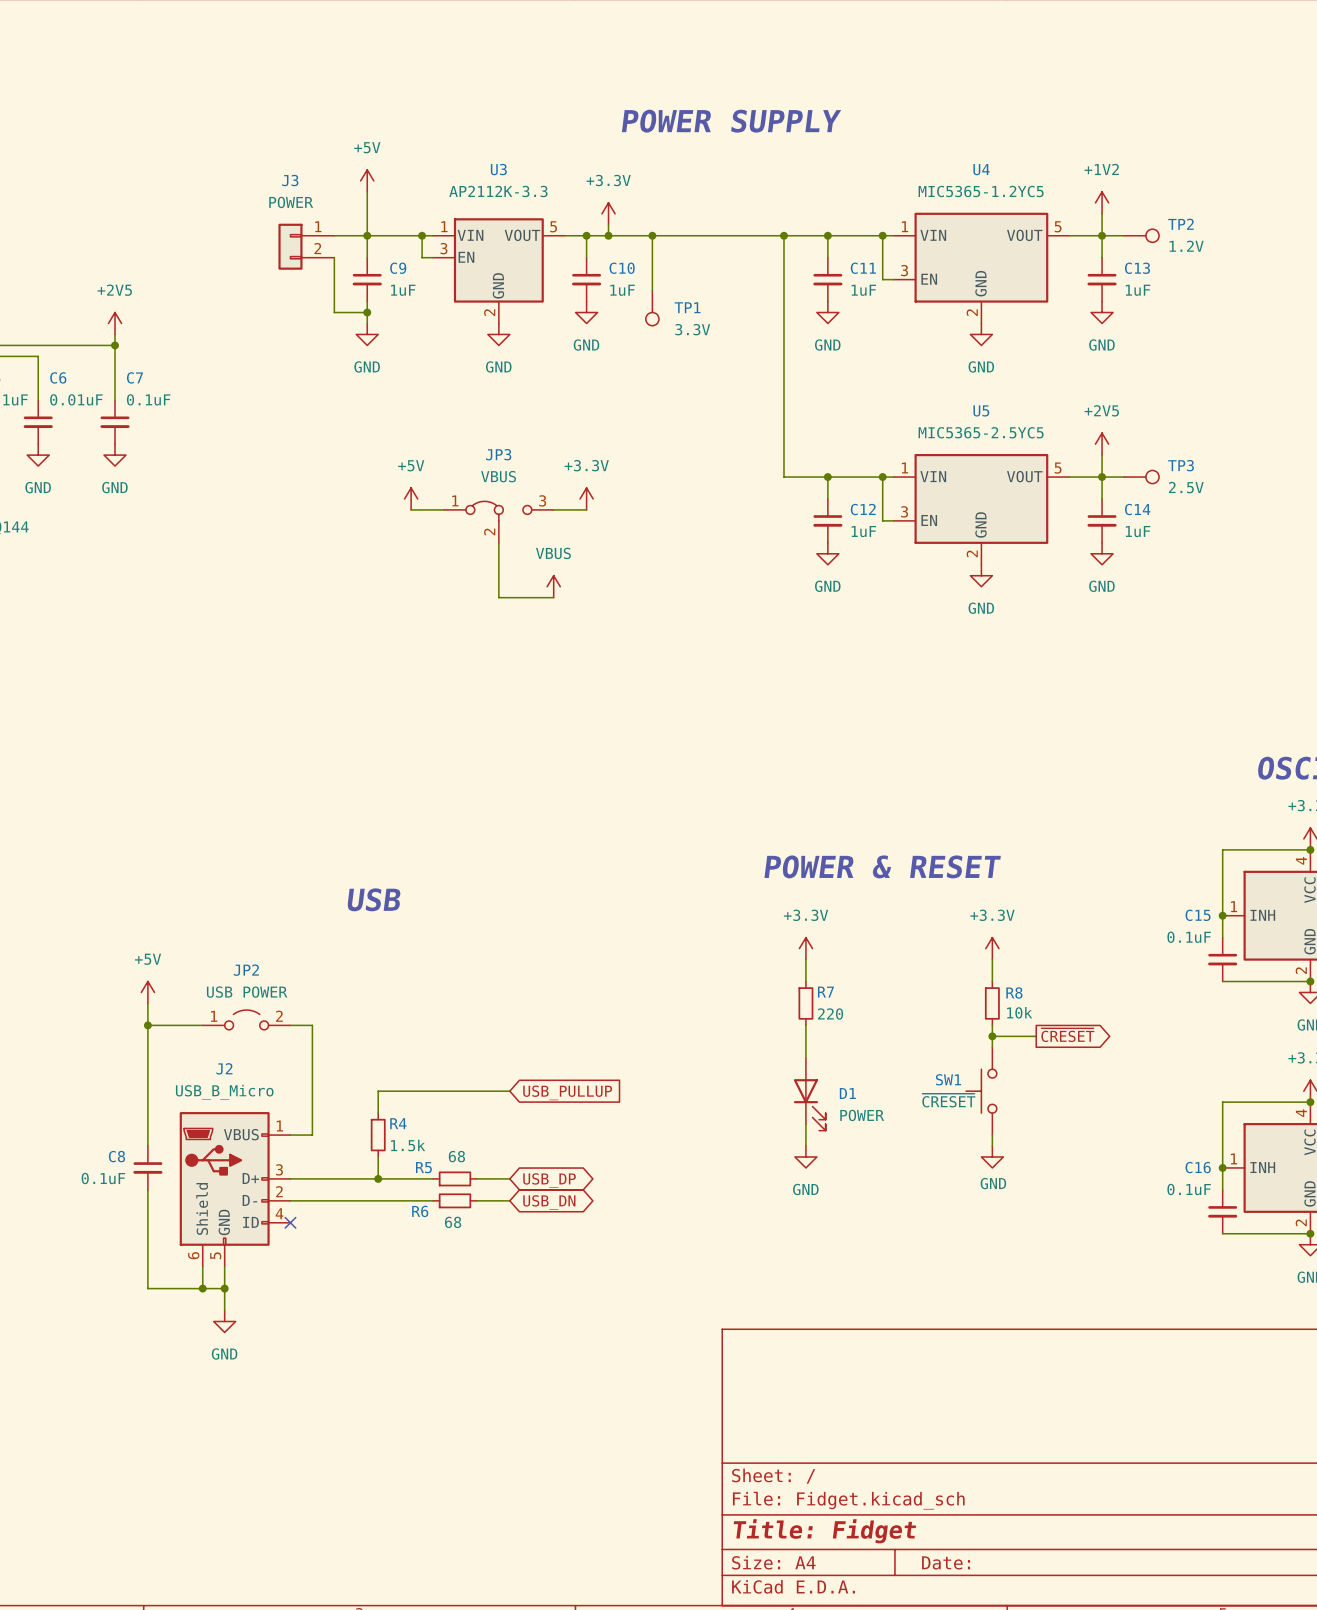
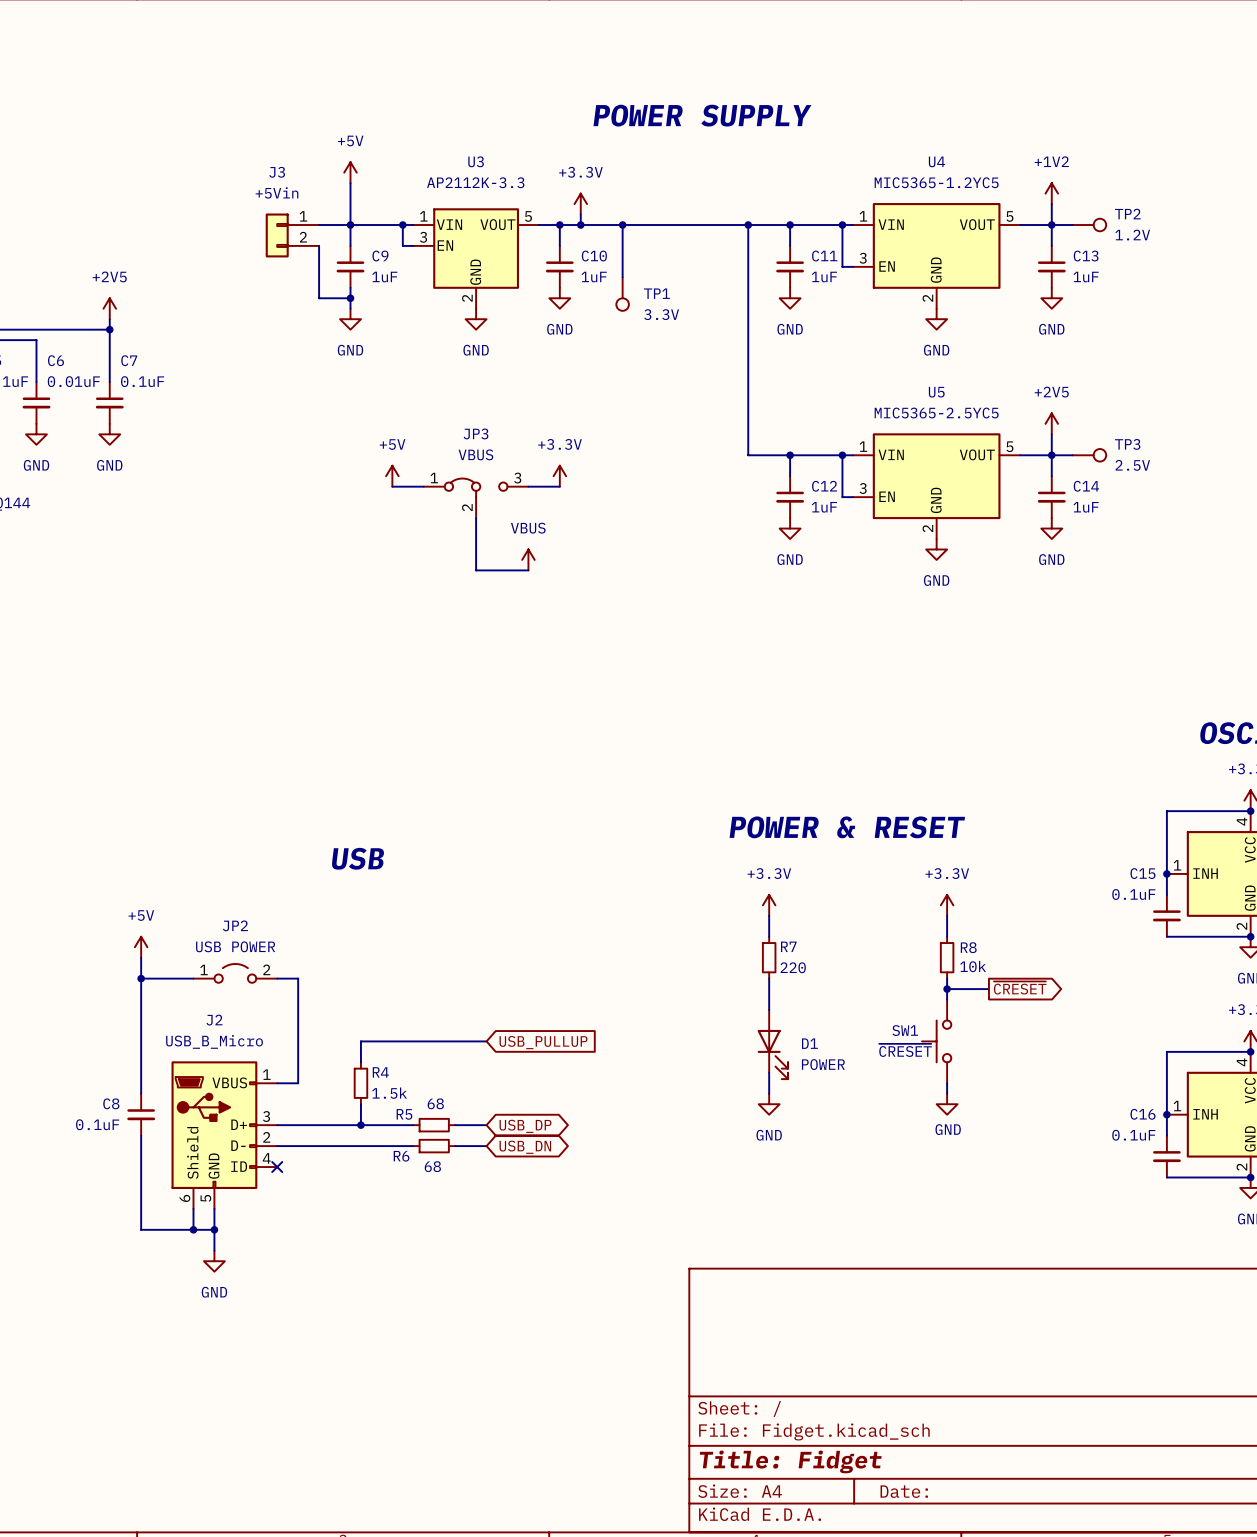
J3 value: POWER (291, 202) -> +5Vin (277, 192)

